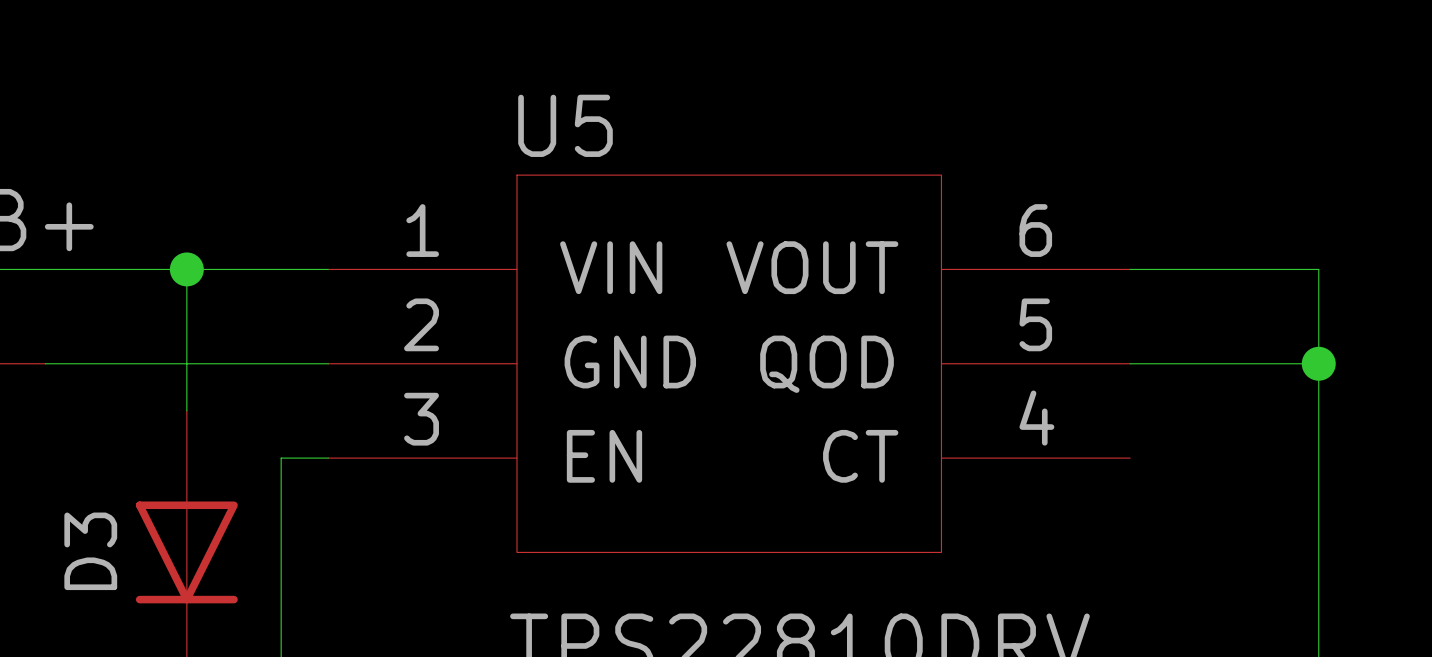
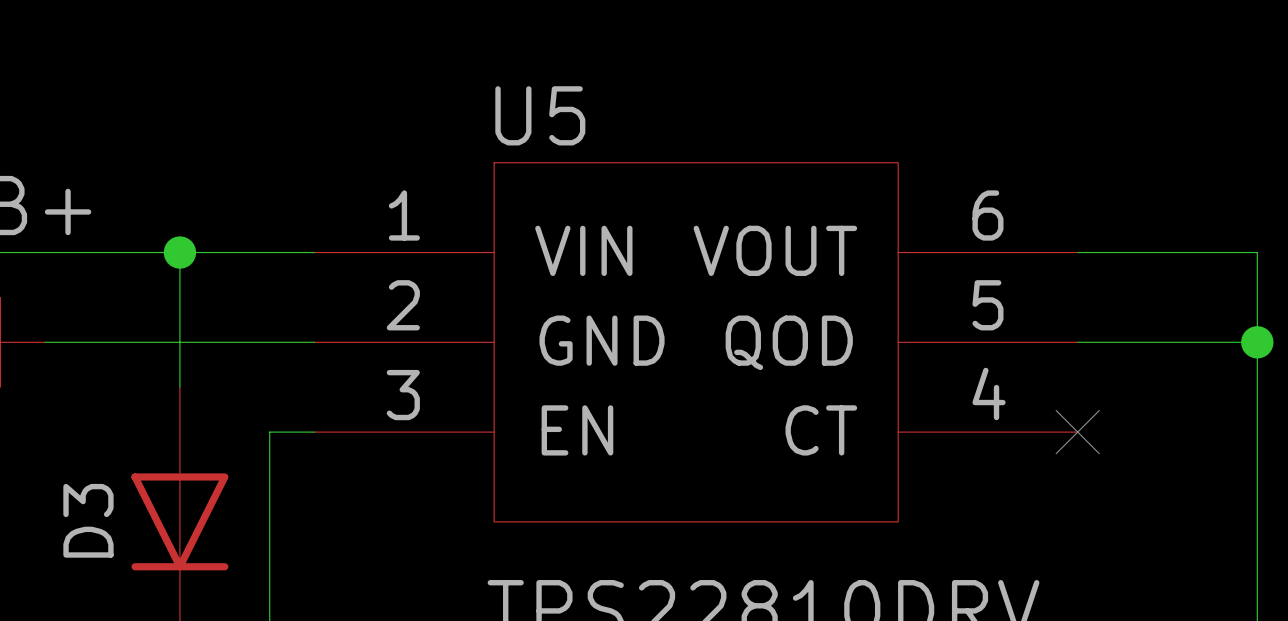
no-connect mark: none -> (1077, 432)

